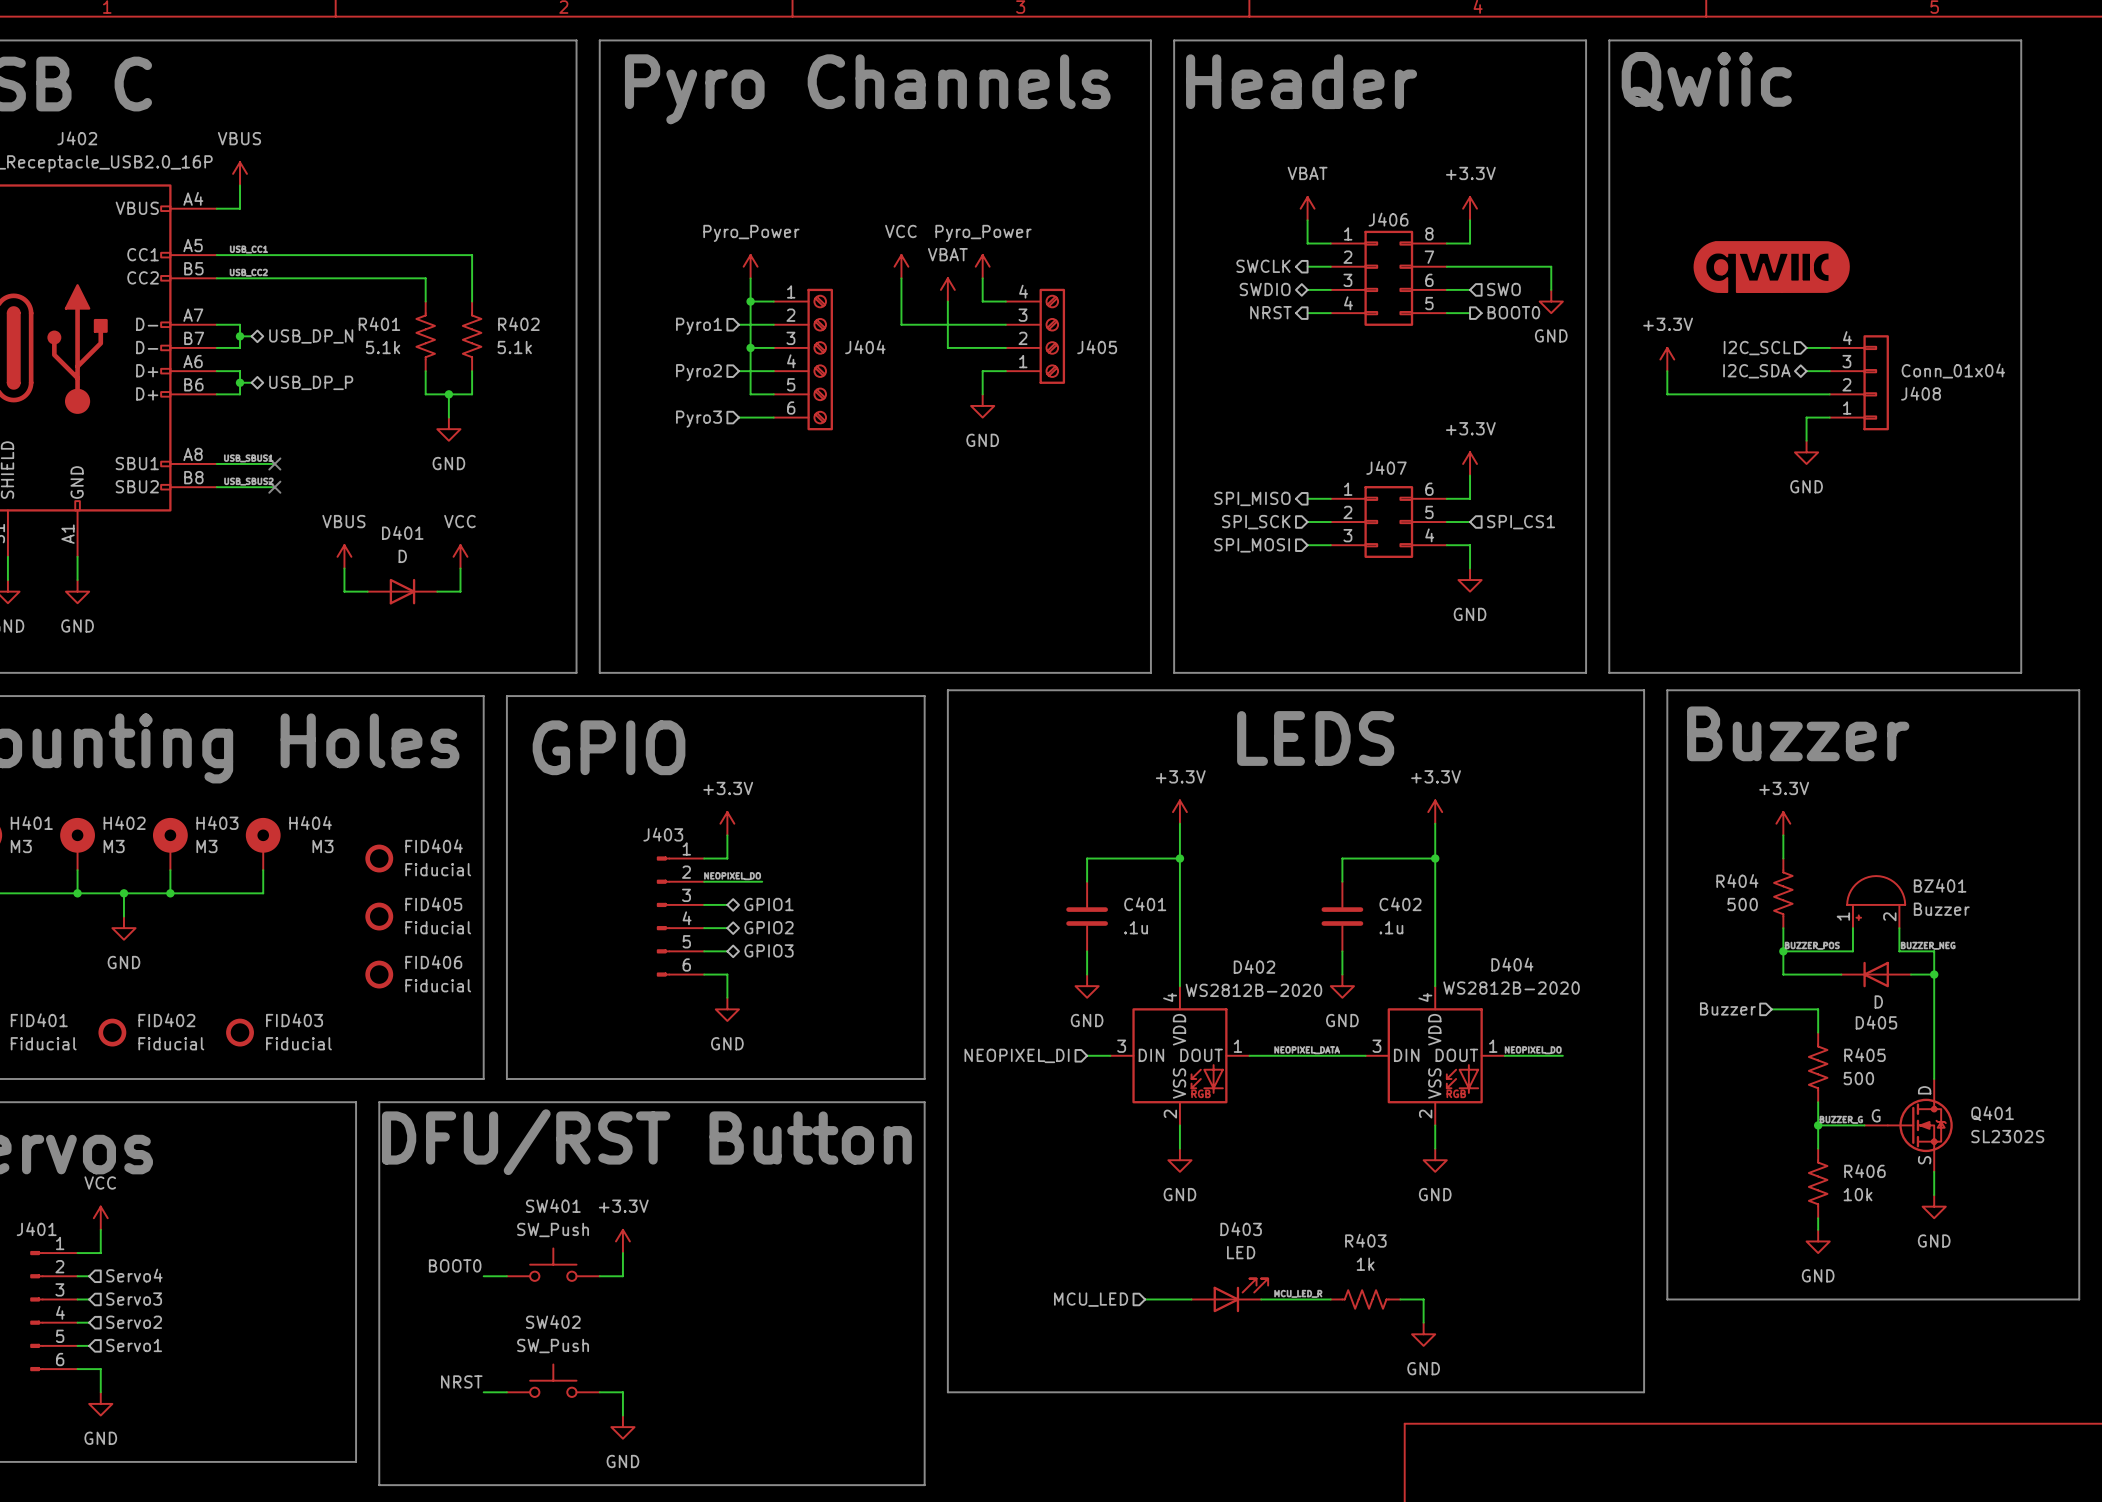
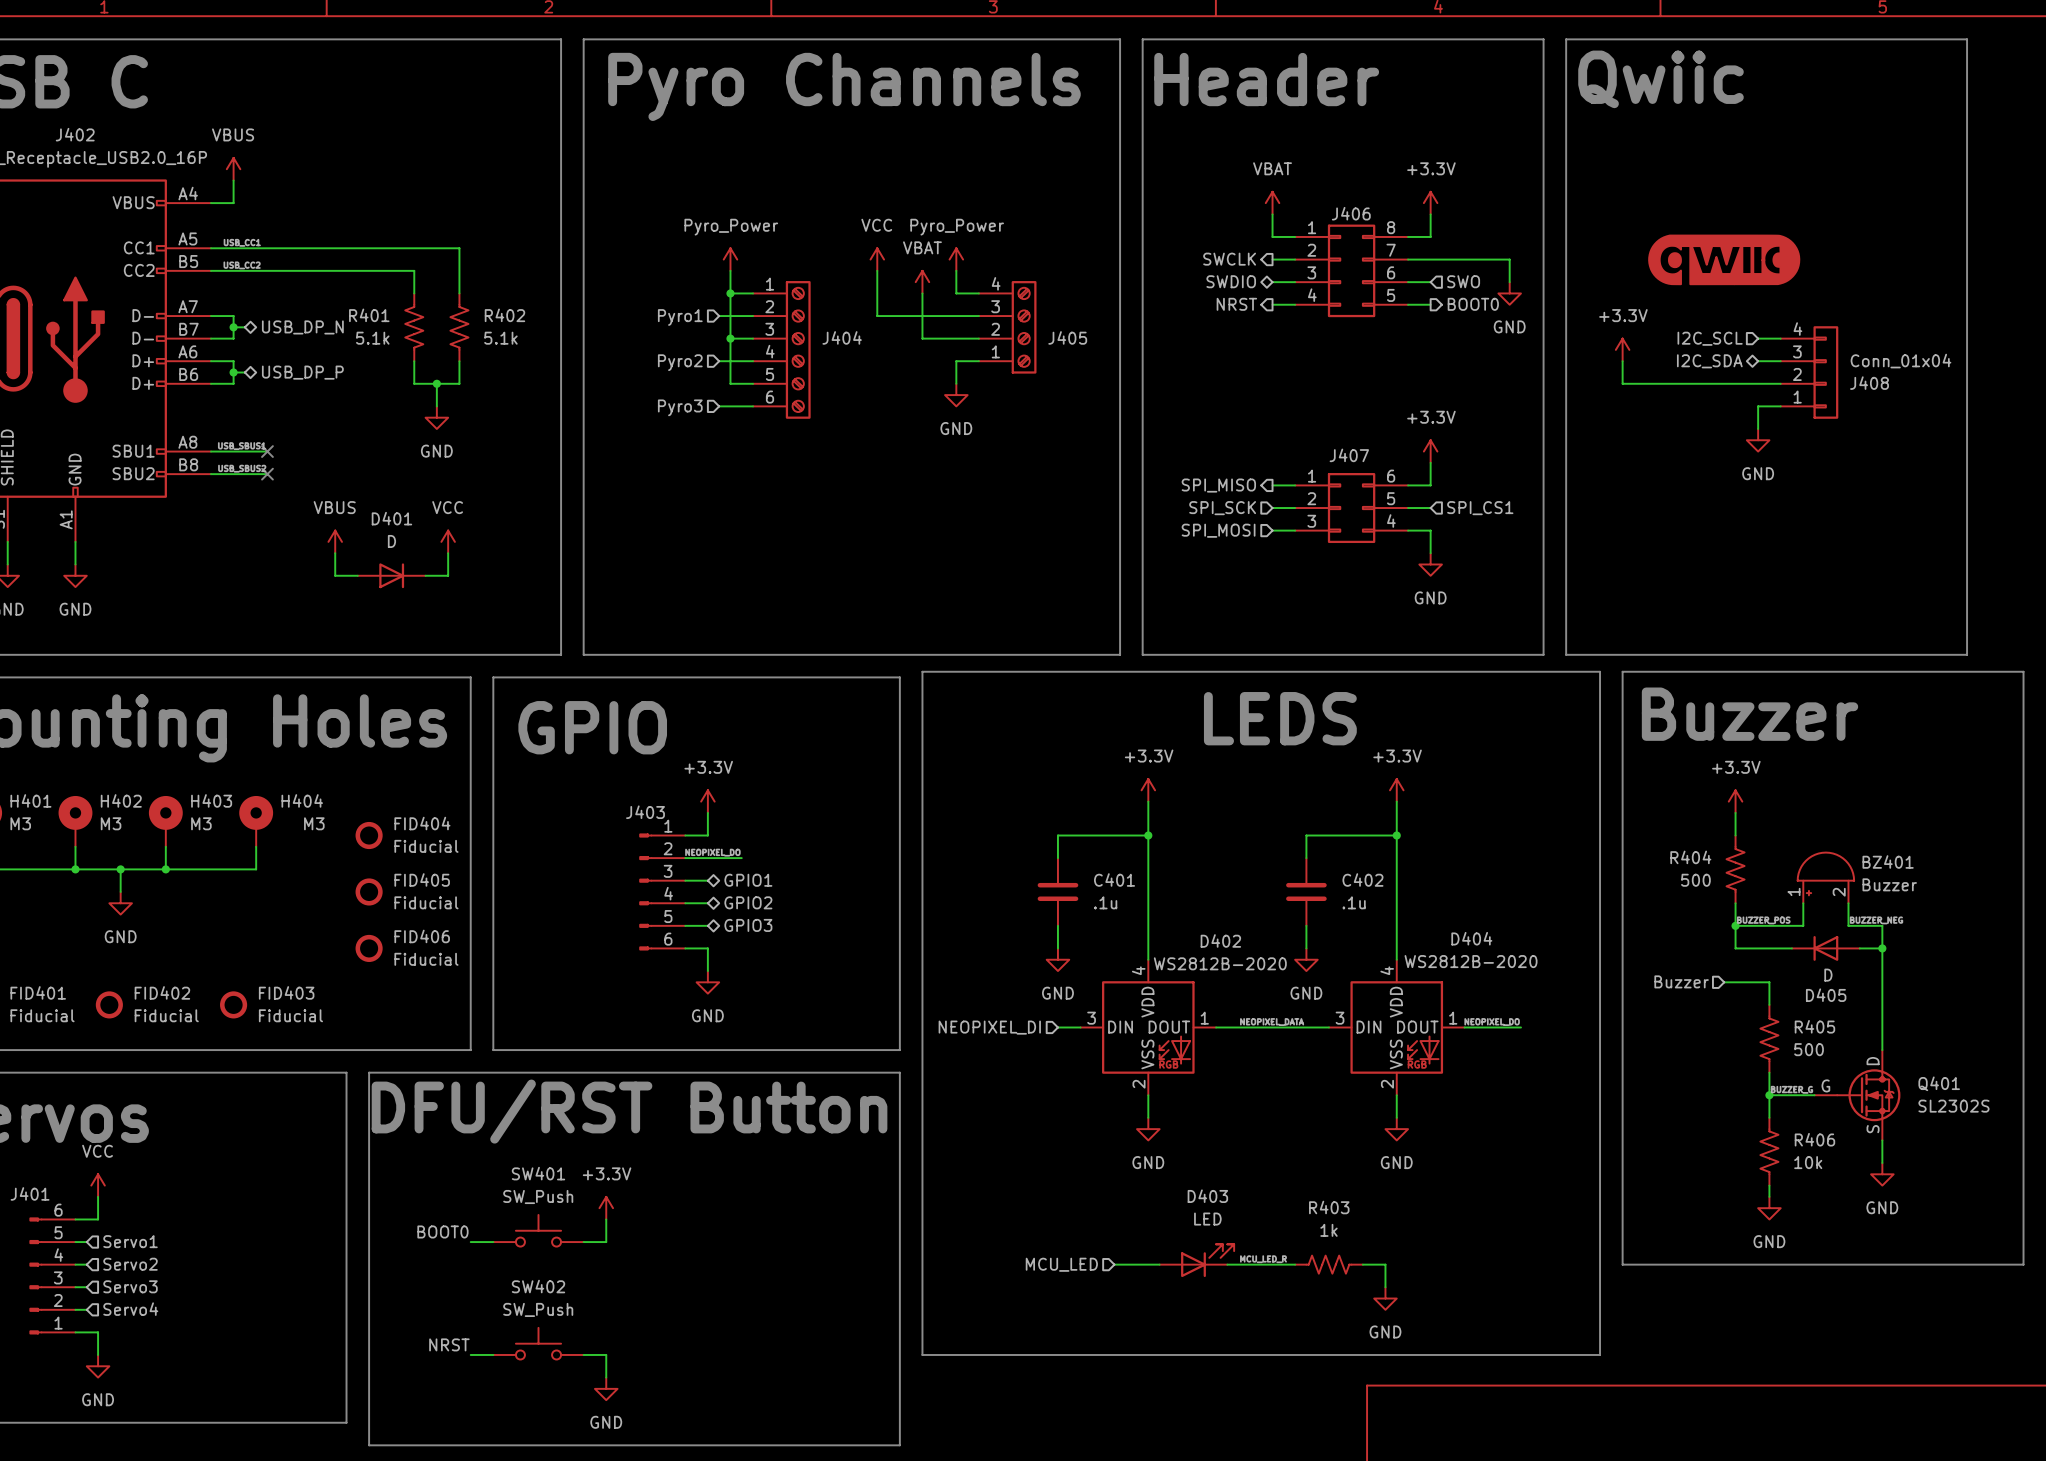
hierarchical label: Servo4 (134, 1275) -> Servo1 (130, 1241)
hierarchical label: Servo3 (134, 1299) -> Servo2 (130, 1264)
J401 flip: as is (36, 1311) -> up-down (35, 1275)
hierarchical label: Servo2 (134, 1322) -> Servo3 (130, 1286)
hierarchical label: Servo1 (134, 1345) -> Servo4 (130, 1309)

